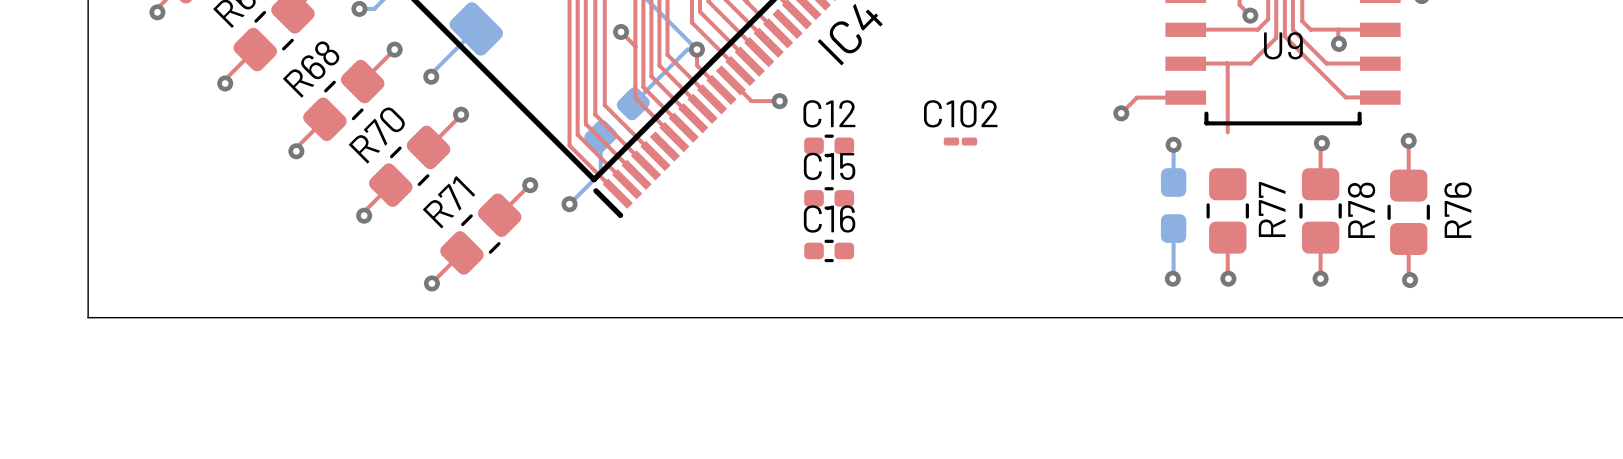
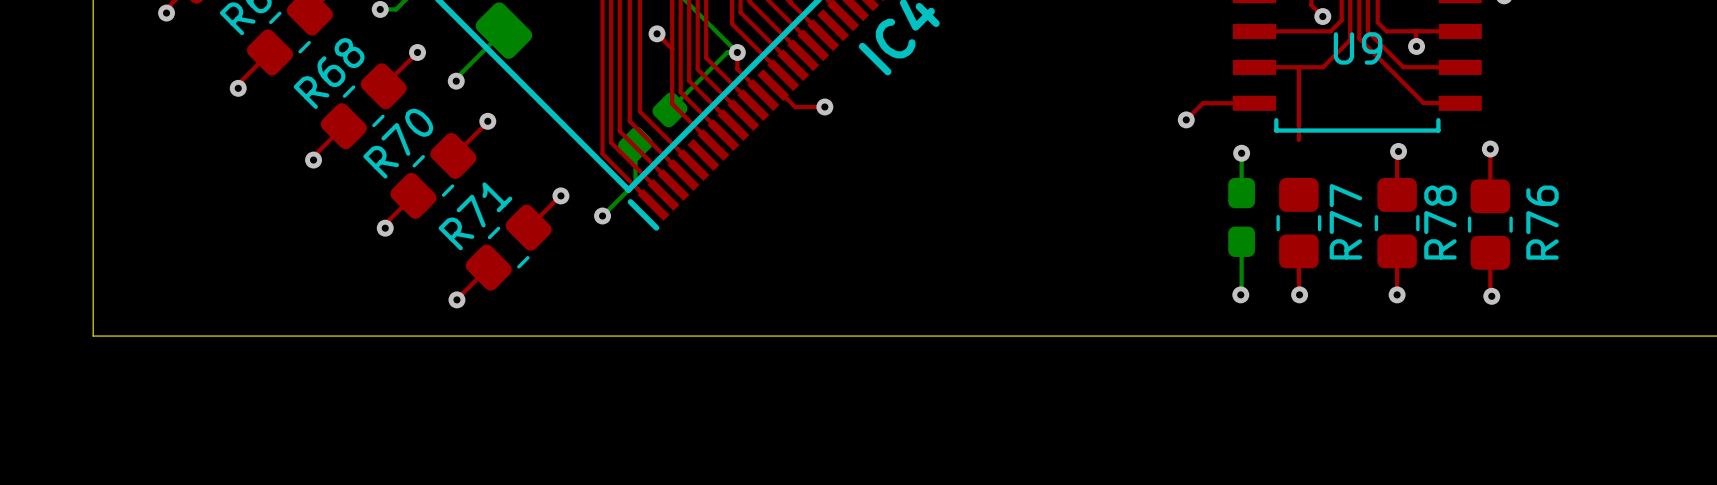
C102: (960, 141) -> none
C12: (829, 145) -> none
C15: (829, 198) -> none
C16: (829, 250) -> none

